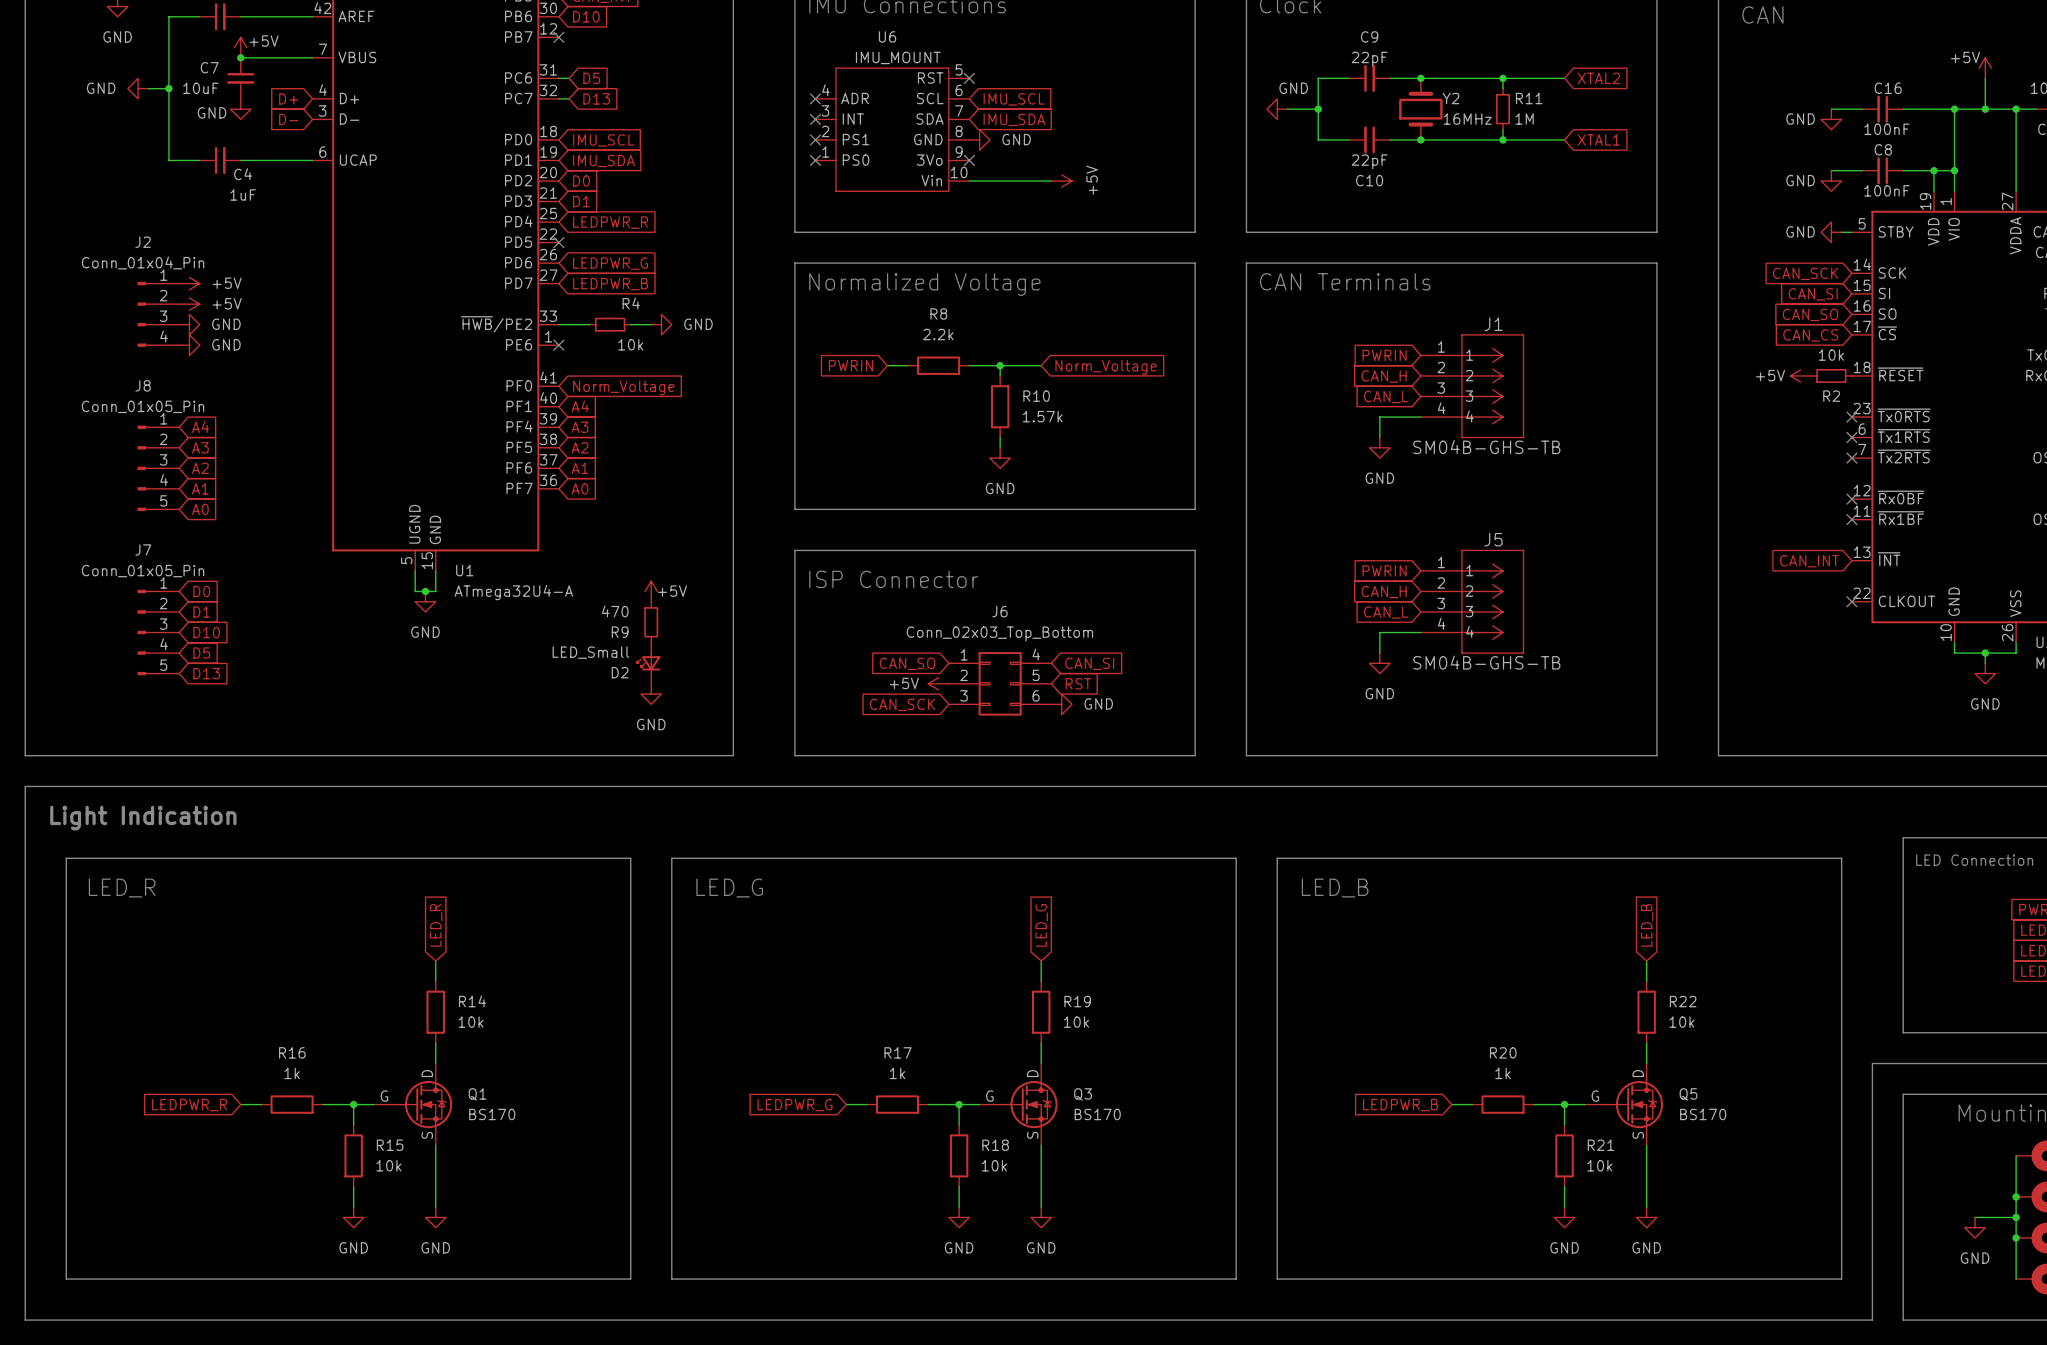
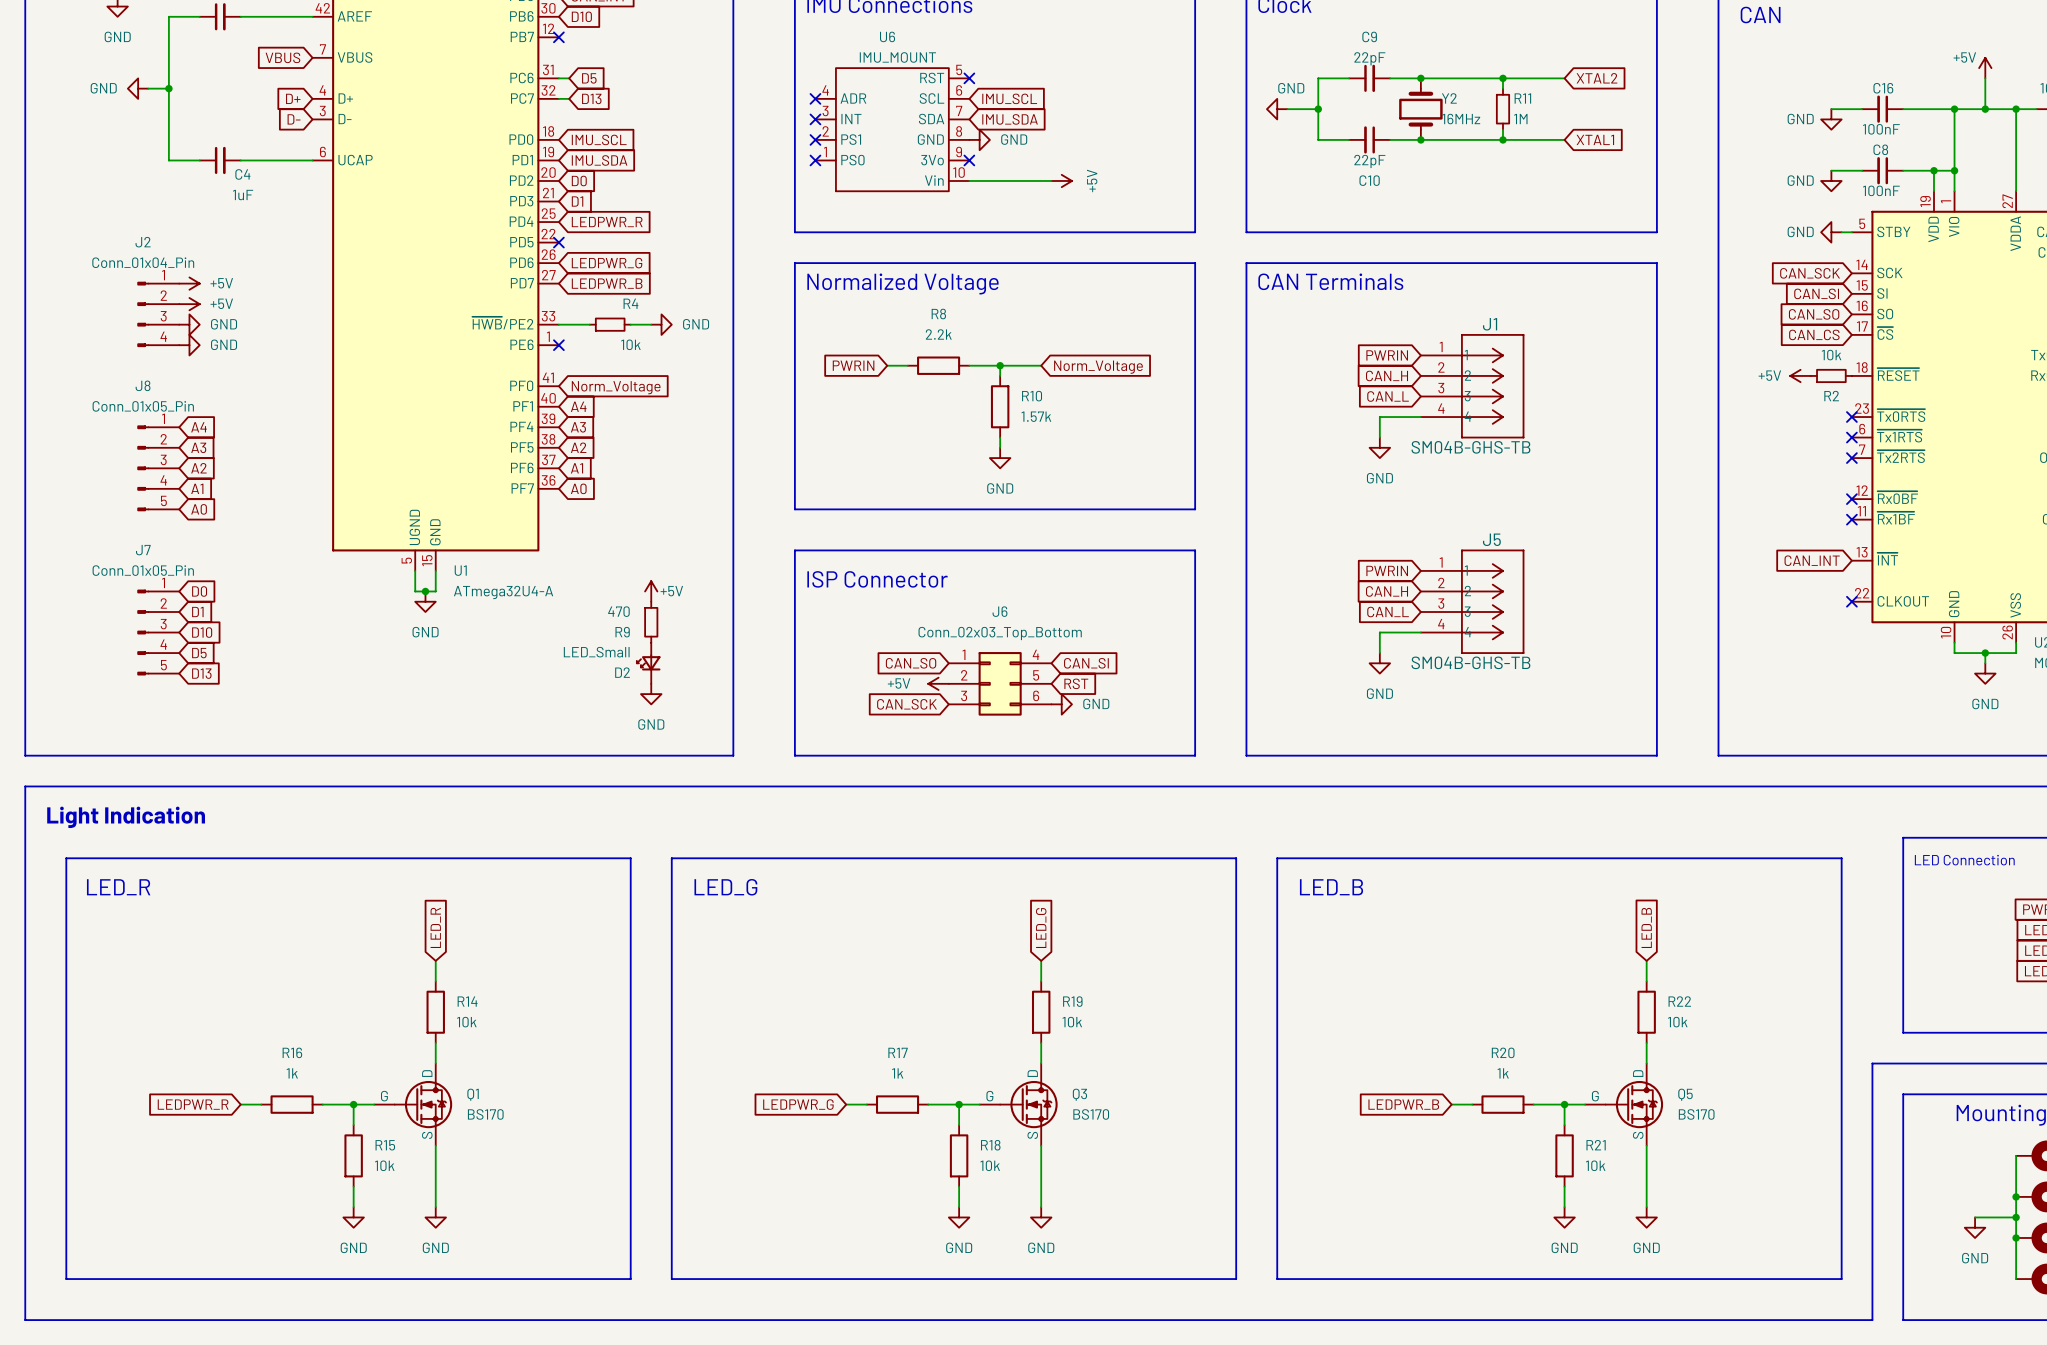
power symbol: +5V (240, 47) -> none
wire: (240, 57) (312, 57) -> none
junction: (240, 57) -> none
global label: none -> VBUS (282, 57)
C7: 10uF (240, 78) -> none
power symbol: GND (240, 109) -> none

